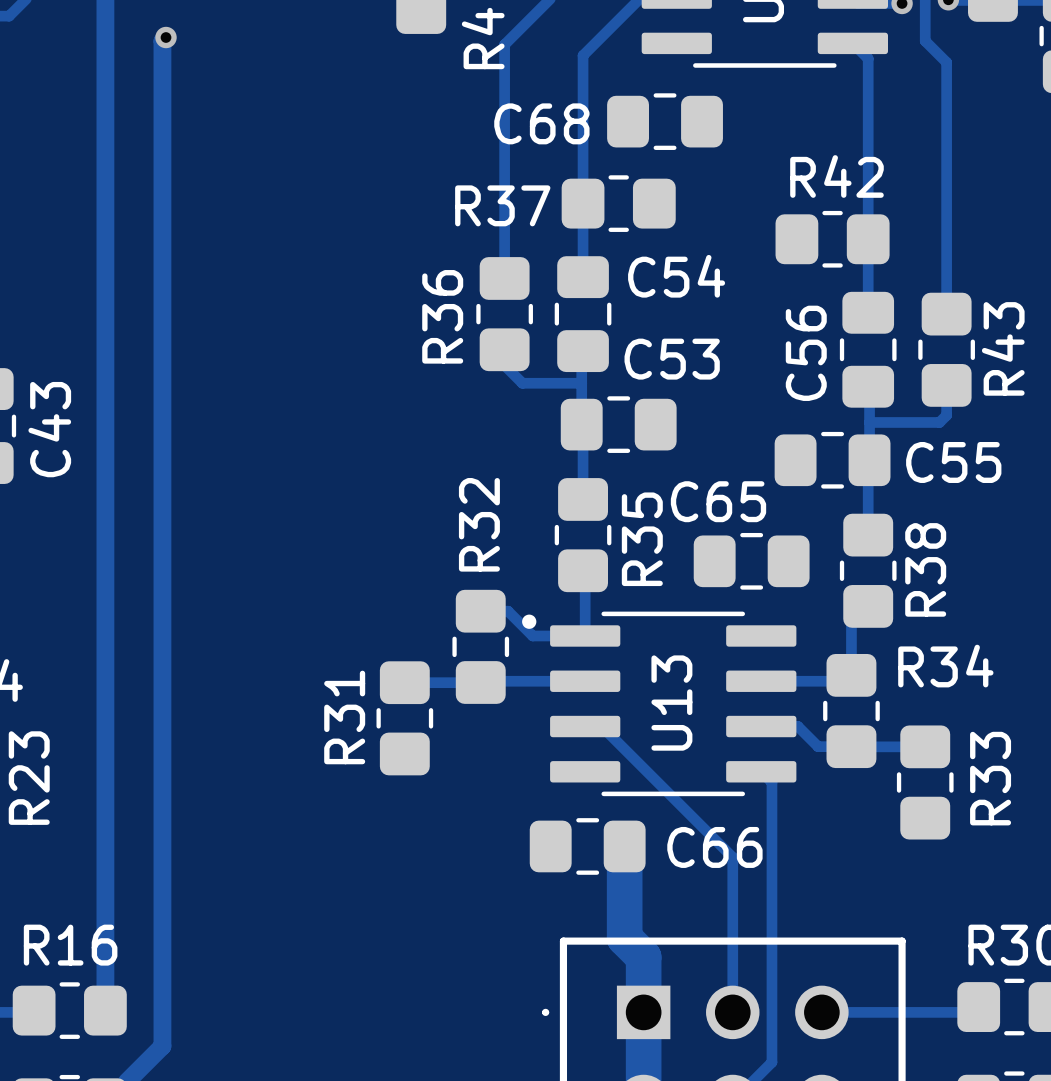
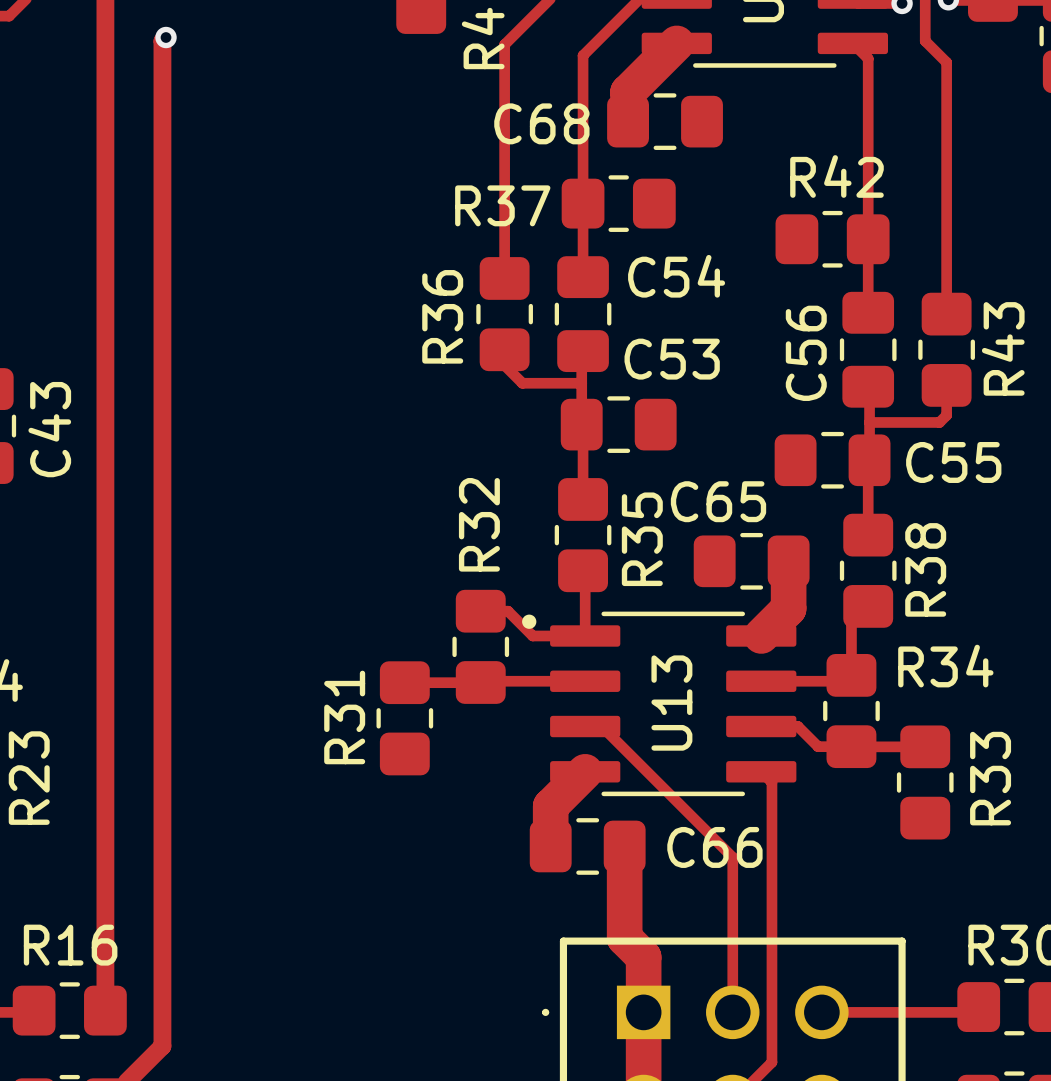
track: none -> (676, 43) (628, 92) (628, 121)
track: none -> (788, 561) (788, 608) (761, 635)
track: none -> (585, 771) (550, 806) (550, 846)

